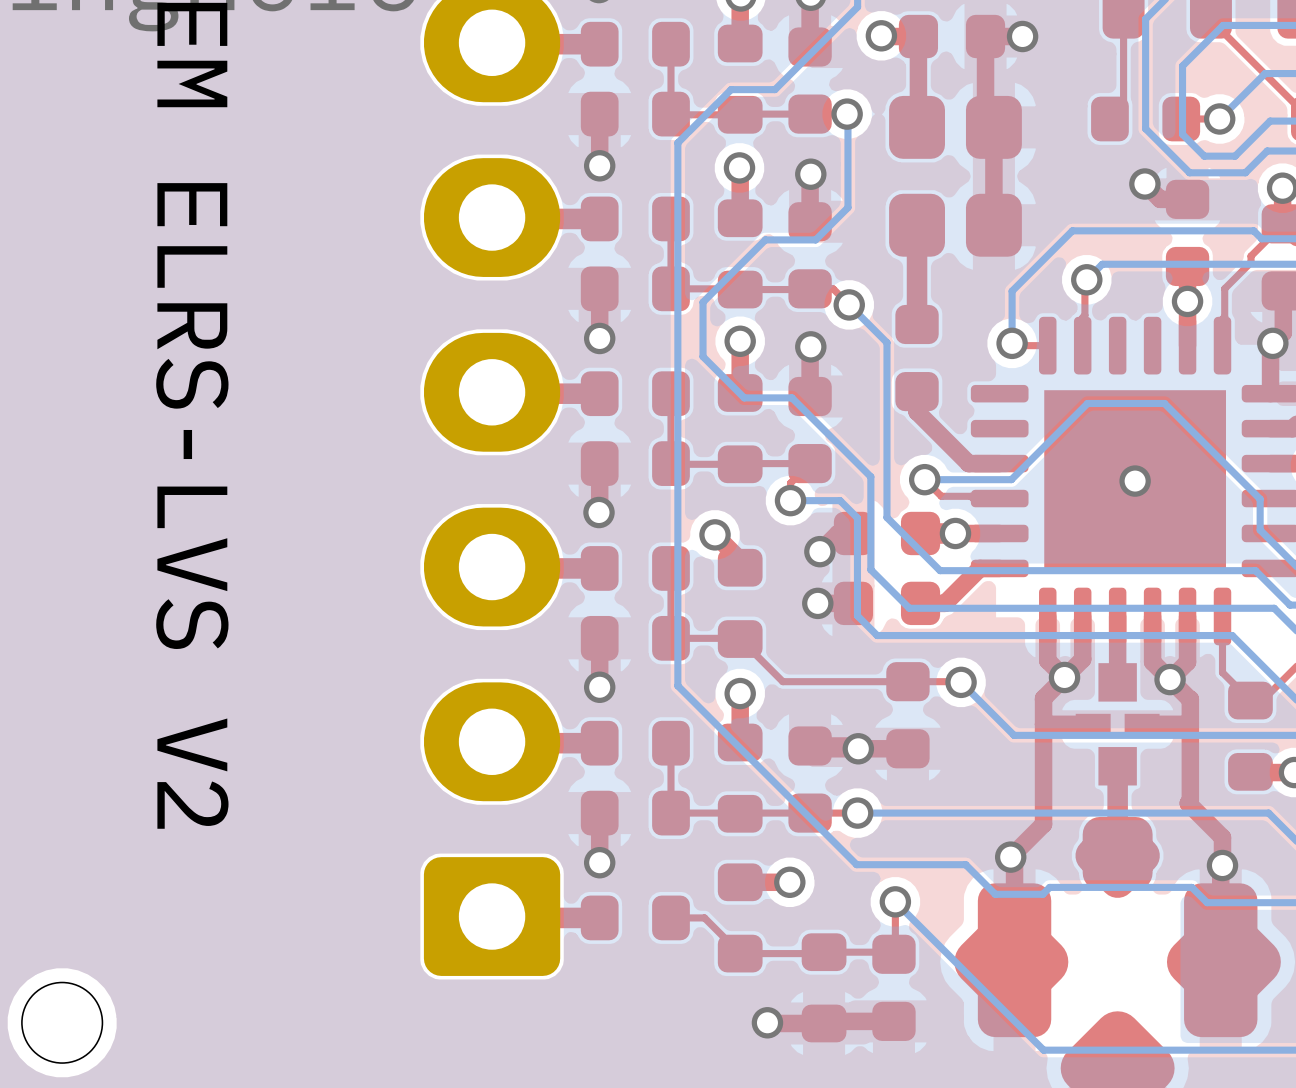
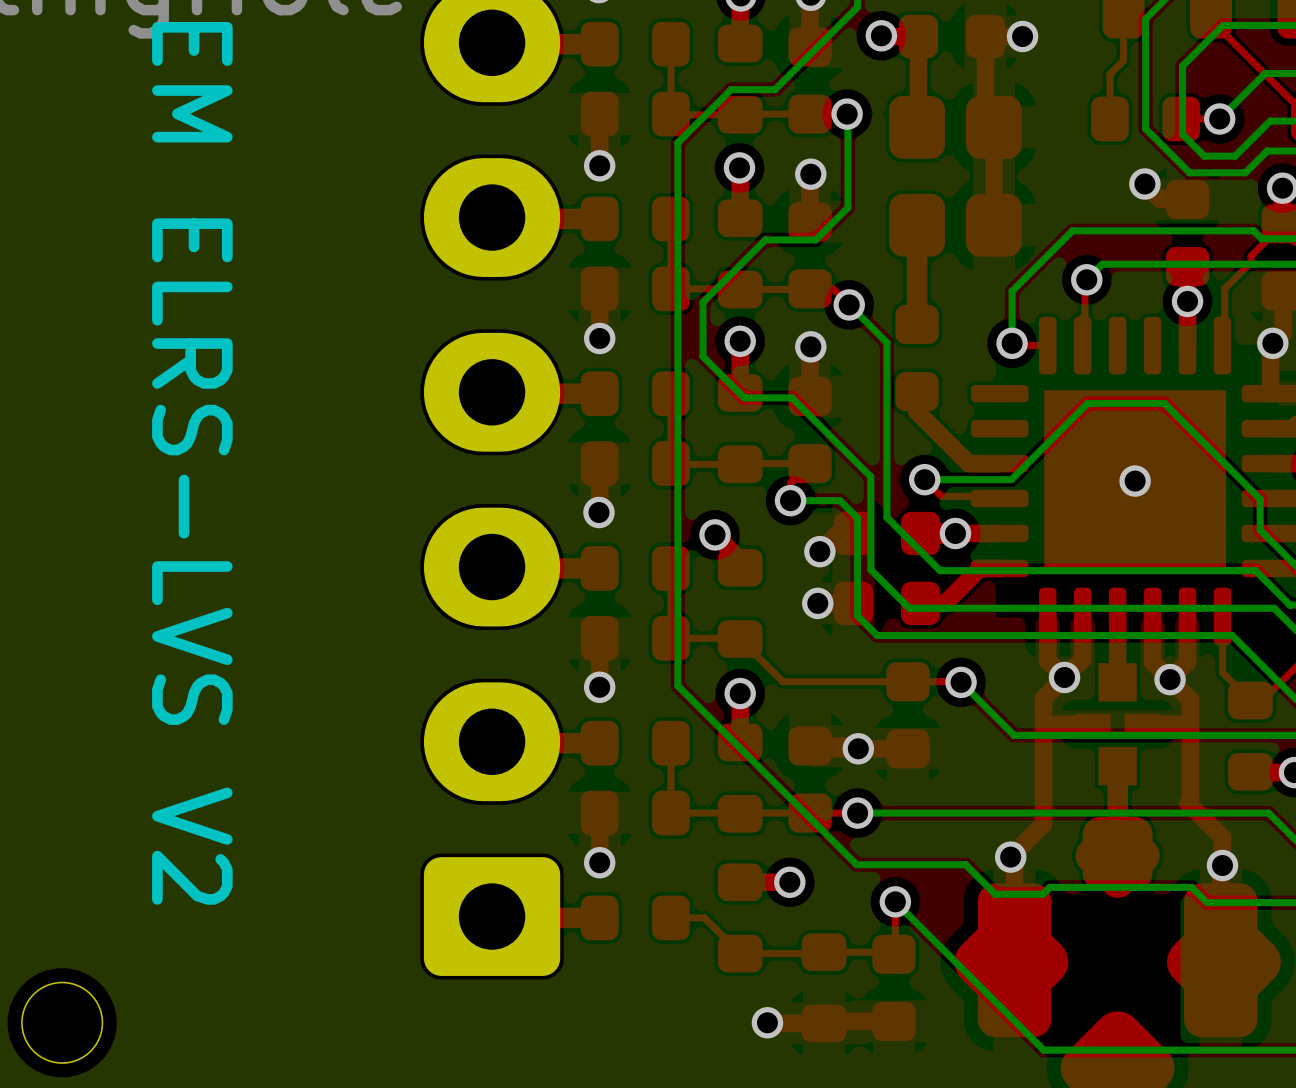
top track: (1123, 60) (1123, 105) (1109, 118) -> (1123, 60) (1109, 74) (1109, 118)

